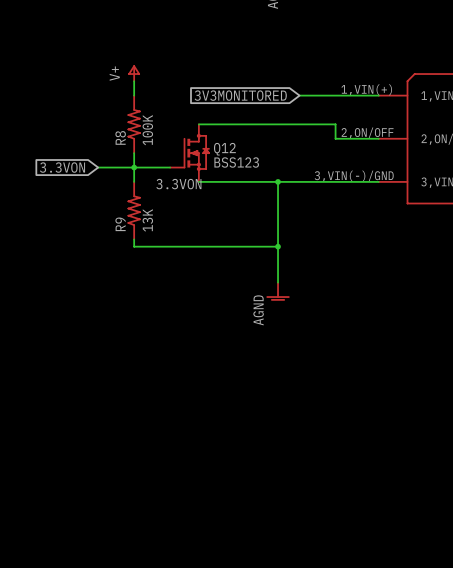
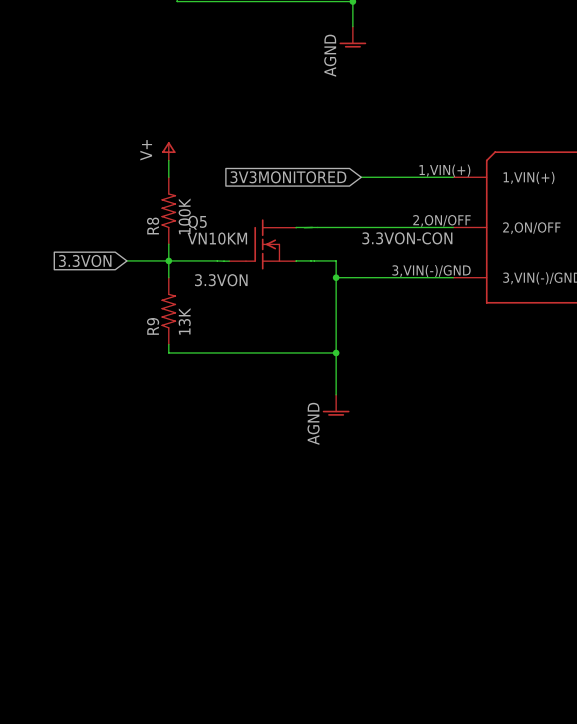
wire: (198, 124) (335, 124) (335, 138) -> (296, 227) (403, 227)
label: none -> 3.3VON-CON (407, 238)
Q12: BSS123 (189, 153) -> none
Q5: none -> VN10KM (262, 244)
wire: (198, 181) (278, 181) -> (296, 261) (336, 260) (336, 277)

